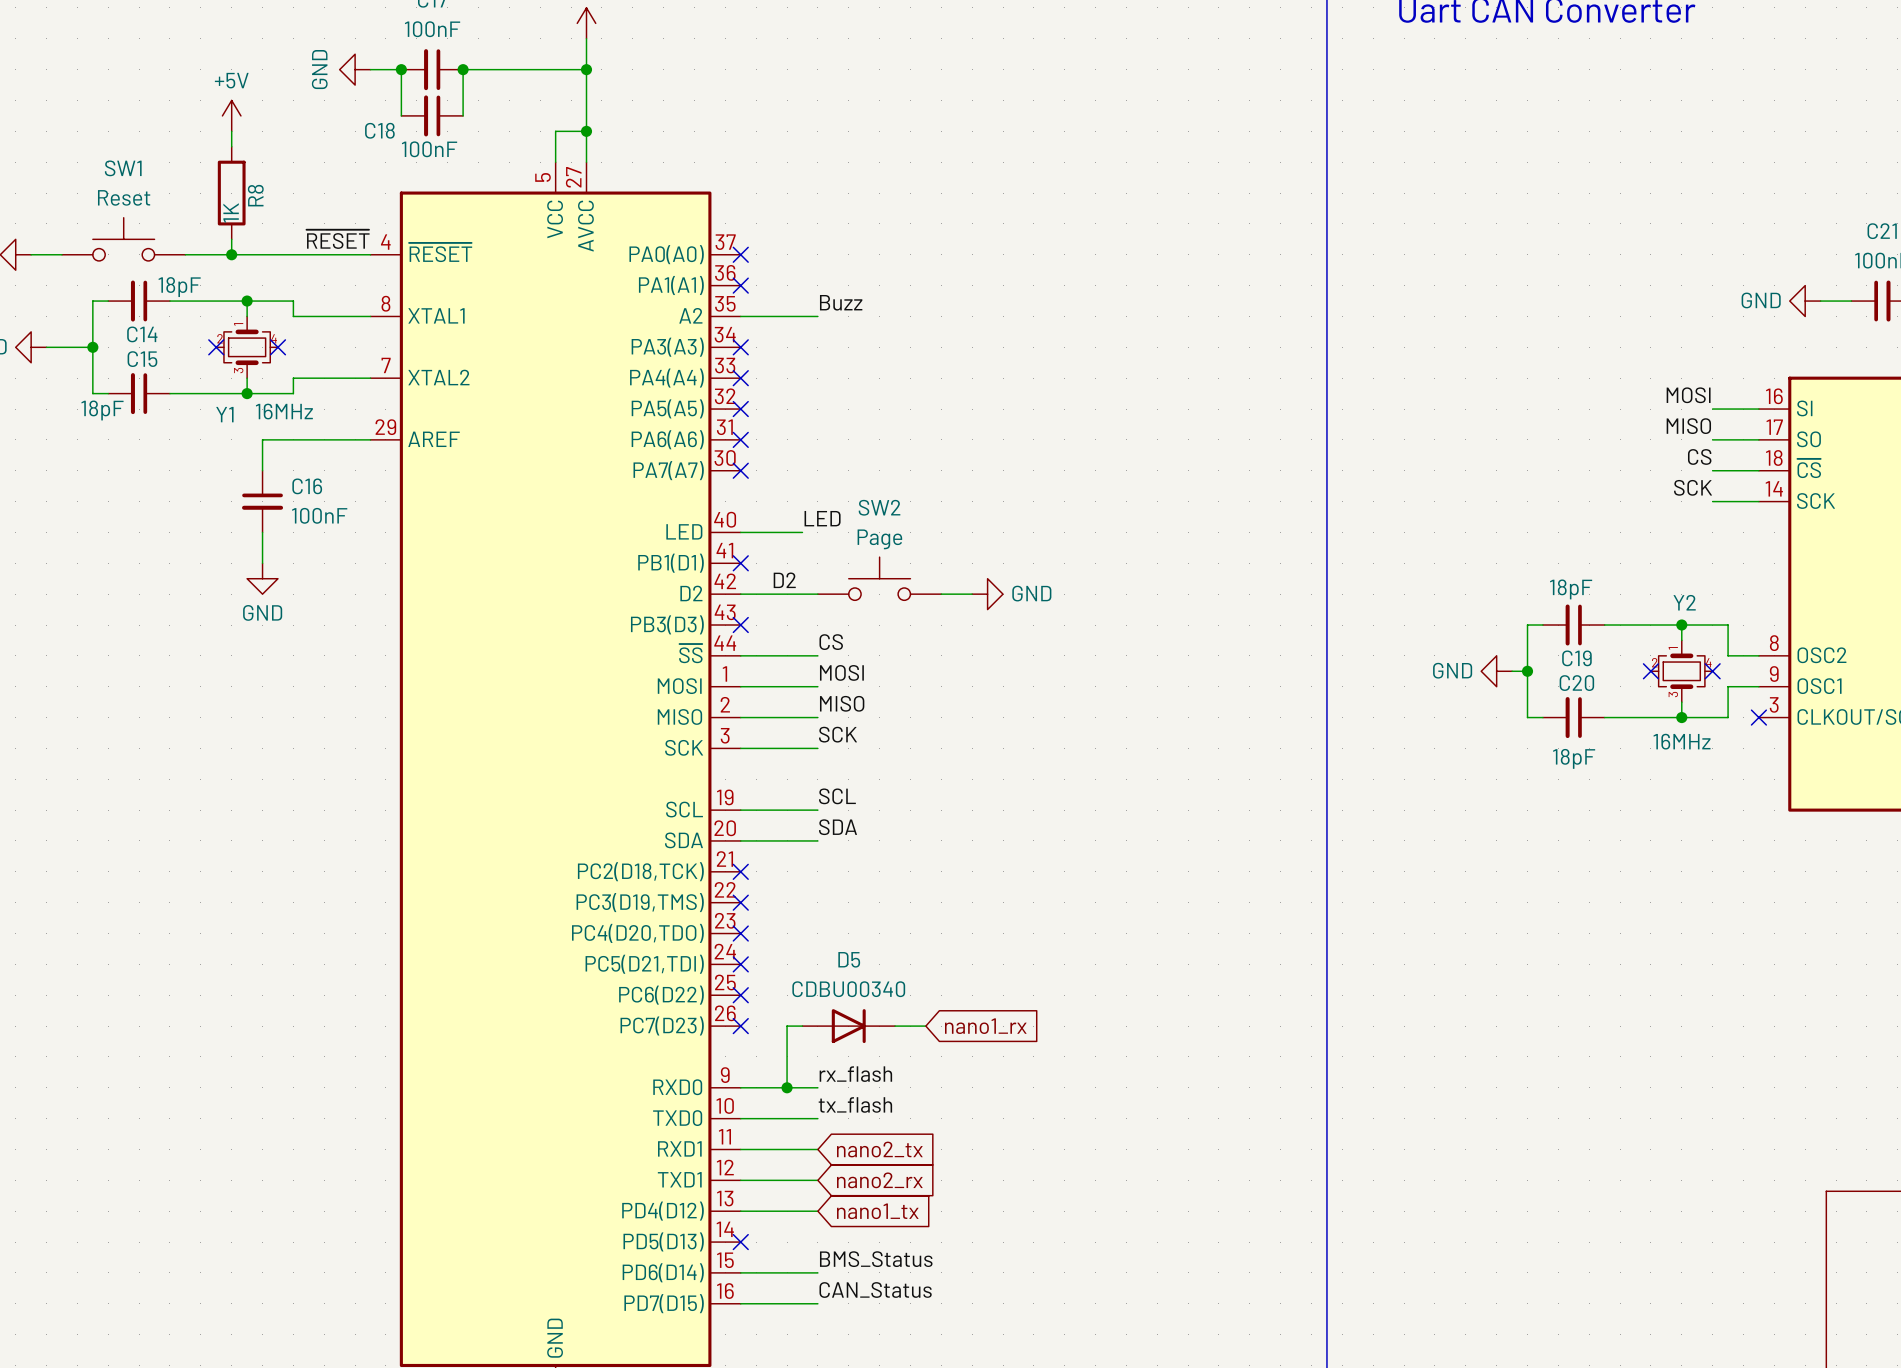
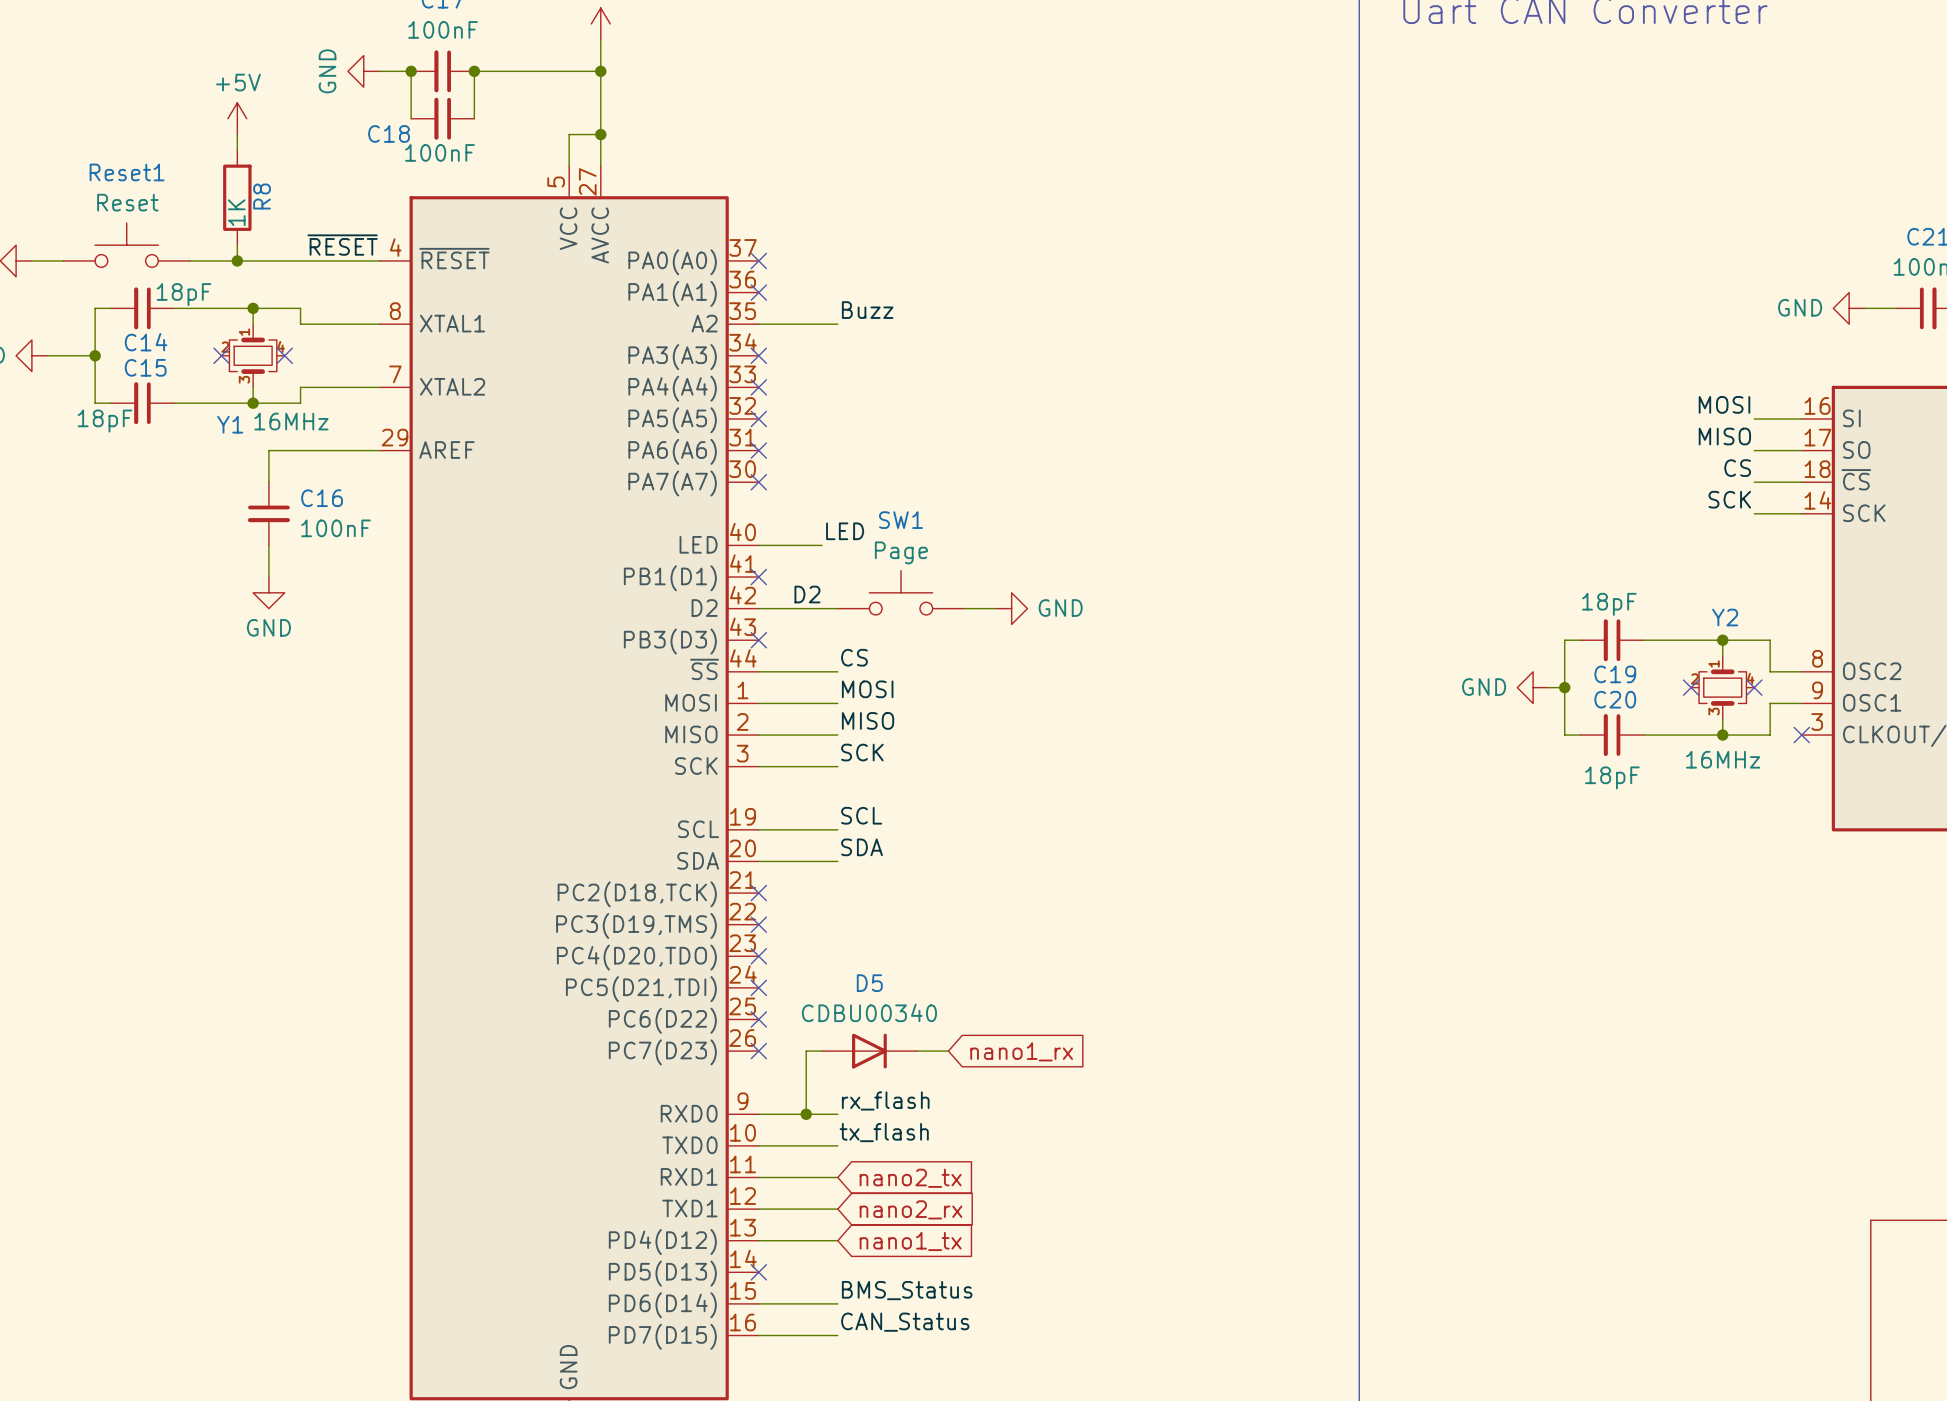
SW1 name: SW1 (123, 168) -> Reset1 (127, 172)
SW2 name: SW2 (879, 507) -> SW1 (901, 520)

